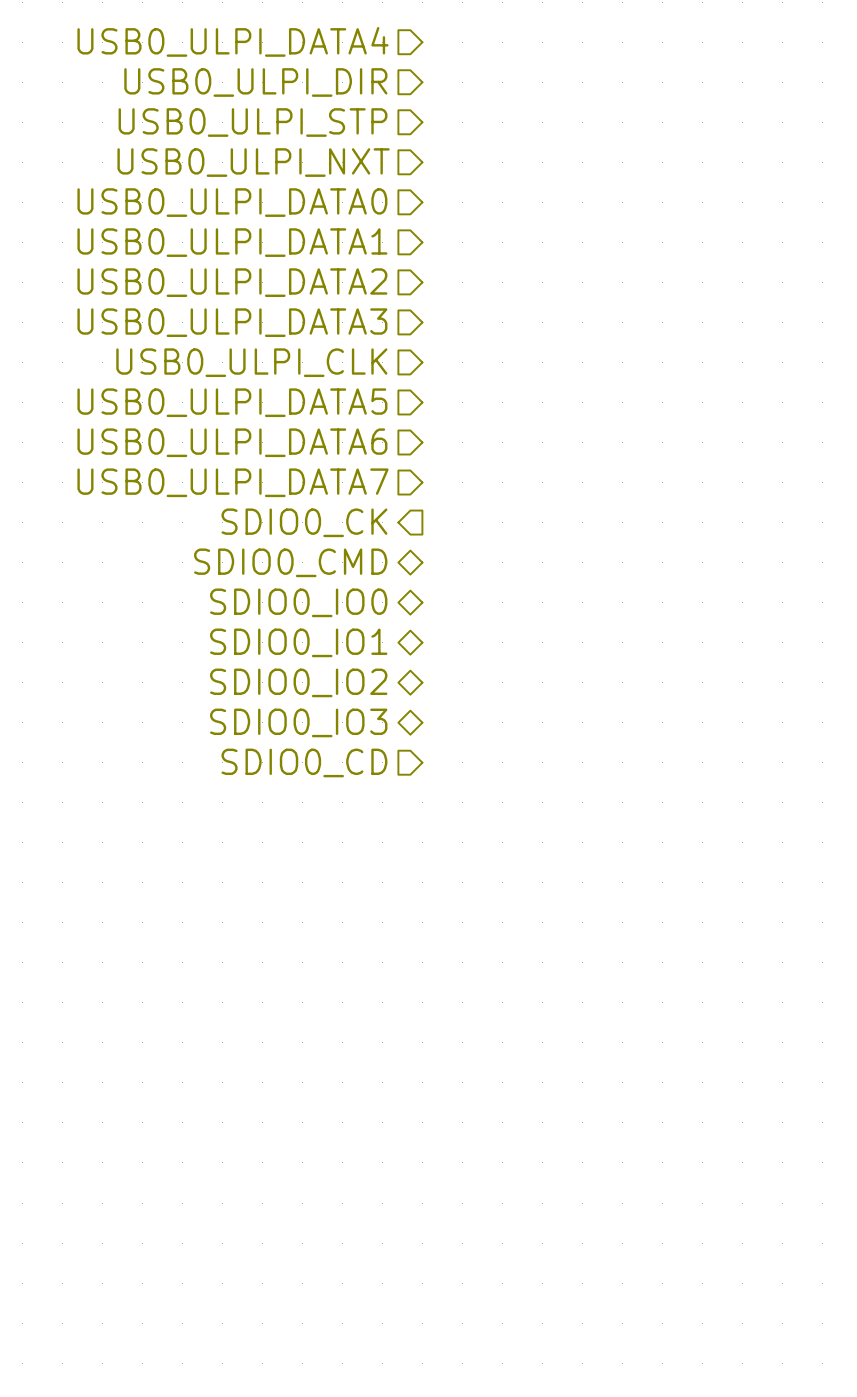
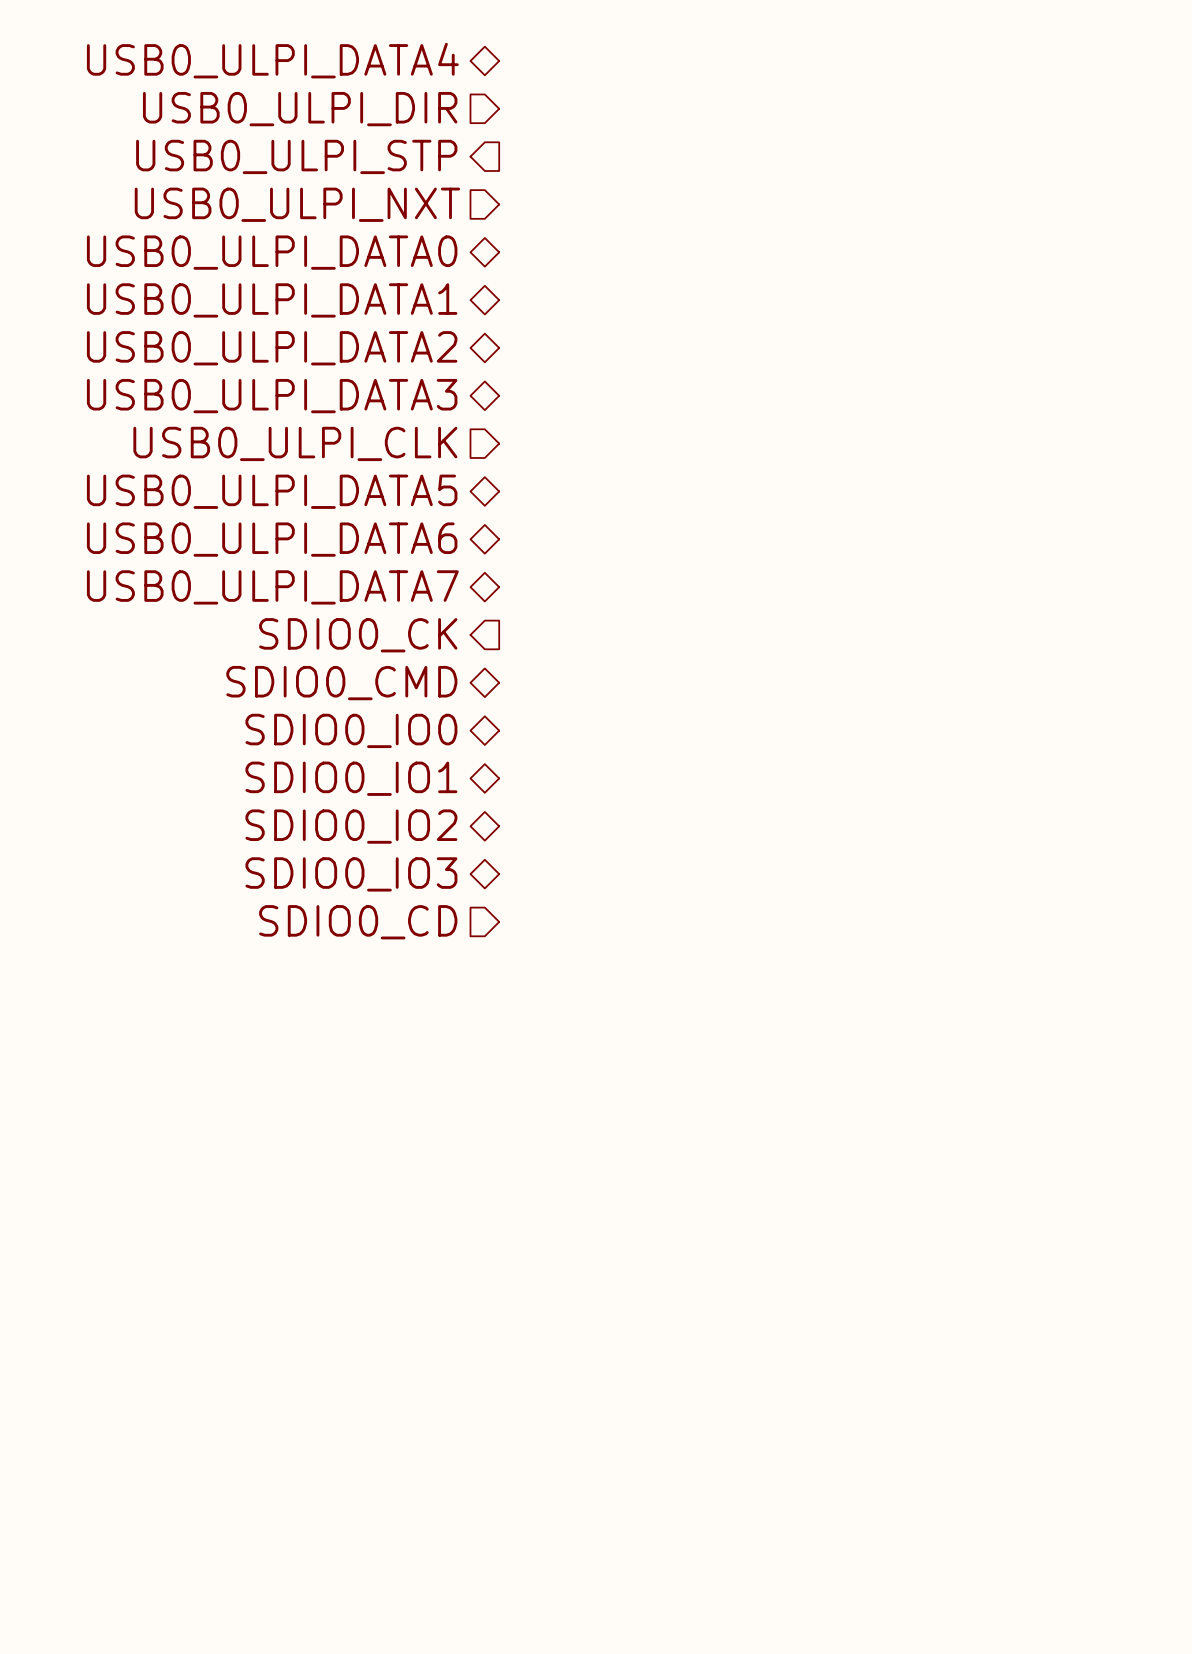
hierarchical label shape: input (232, 41) -> bidirectional (272, 60)
hierarchical label shape: input (252, 122) -> output (296, 156)
hierarchical label shape: input (232, 202) -> bidirectional (272, 252)
hierarchical label shape: input (232, 242) -> bidirectional (272, 300)
hierarchical label shape: input (232, 282) -> bidirectional (272, 348)
hierarchical label shape: input (232, 322) -> bidirectional (272, 396)
hierarchical label shape: input (232, 402) -> bidirectional (272, 491)
hierarchical label shape: input (232, 442) -> bidirectional (272, 539)
hierarchical label shape: input (232, 482) -> bidirectional (272, 587)

